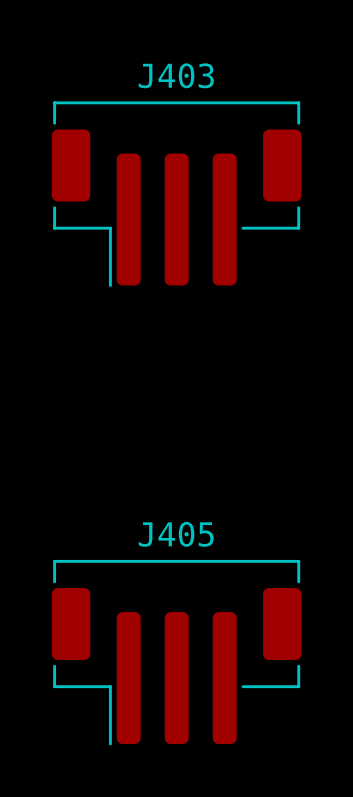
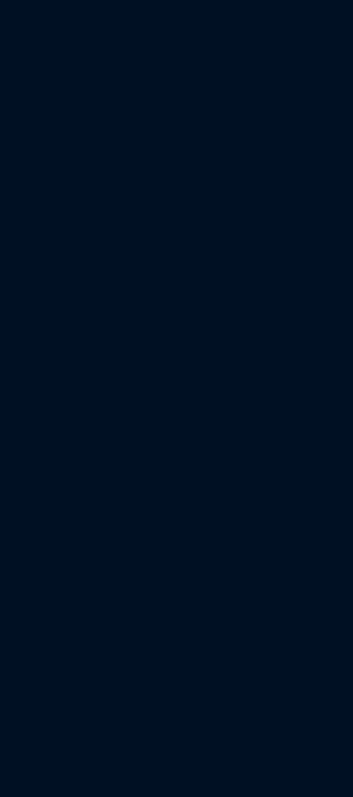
J403: (176, 194) -> none
J405: (176, 652) -> none

